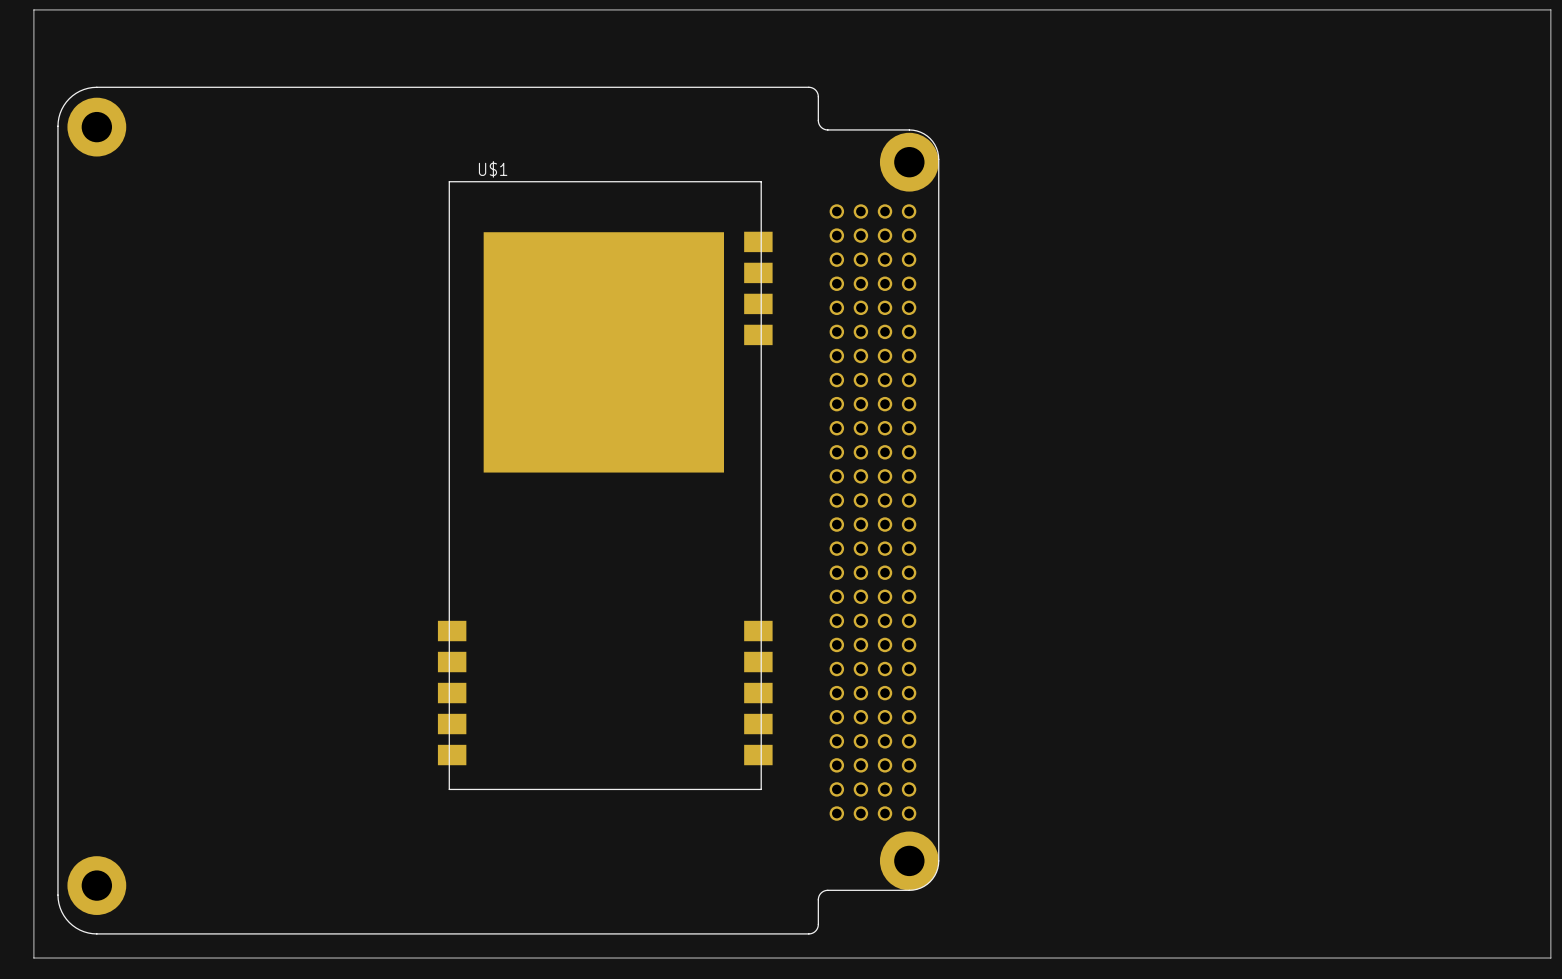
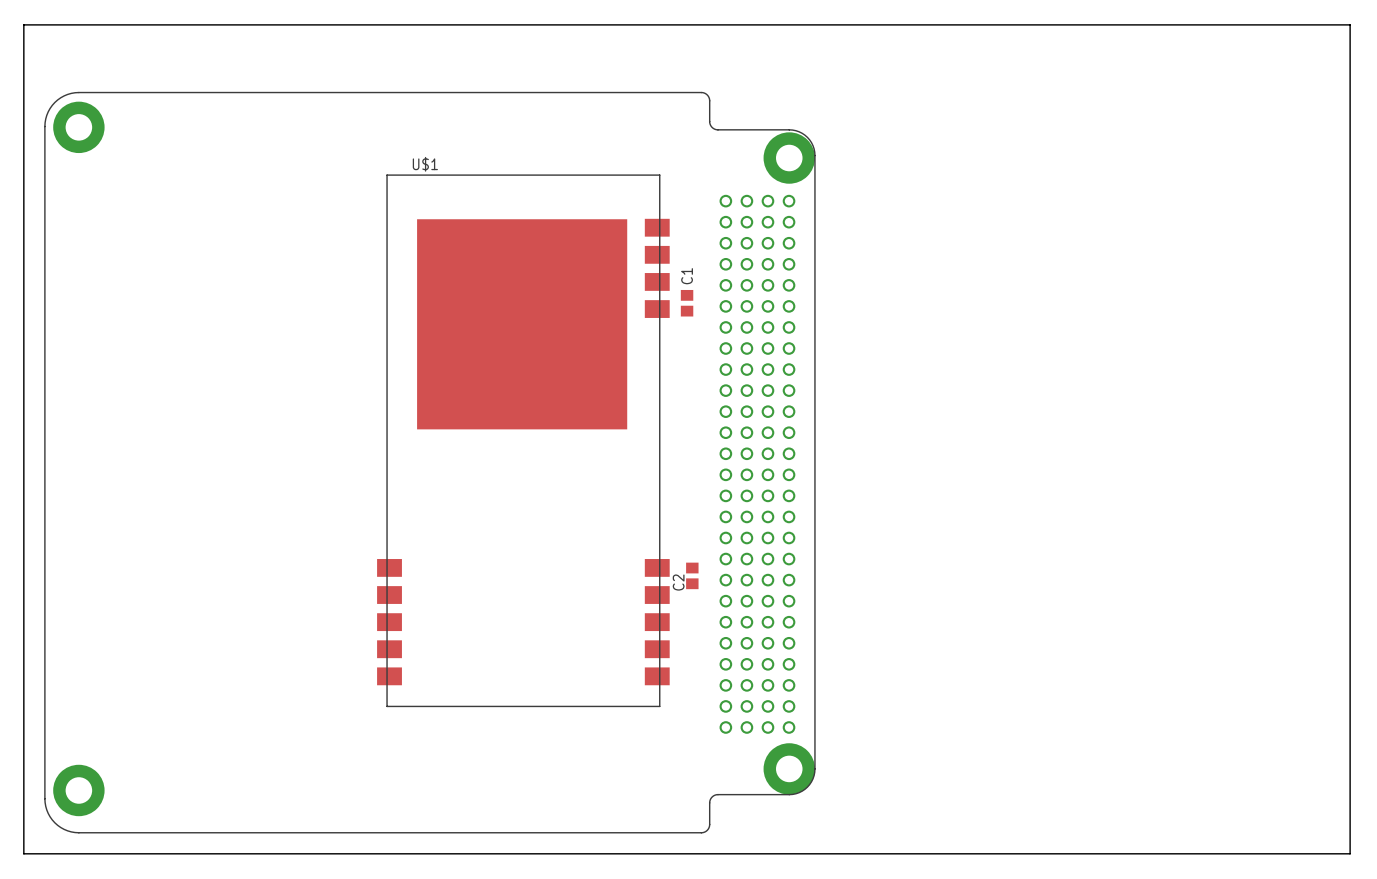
C1: none -> (687, 303)
C2: none -> (692, 575)

